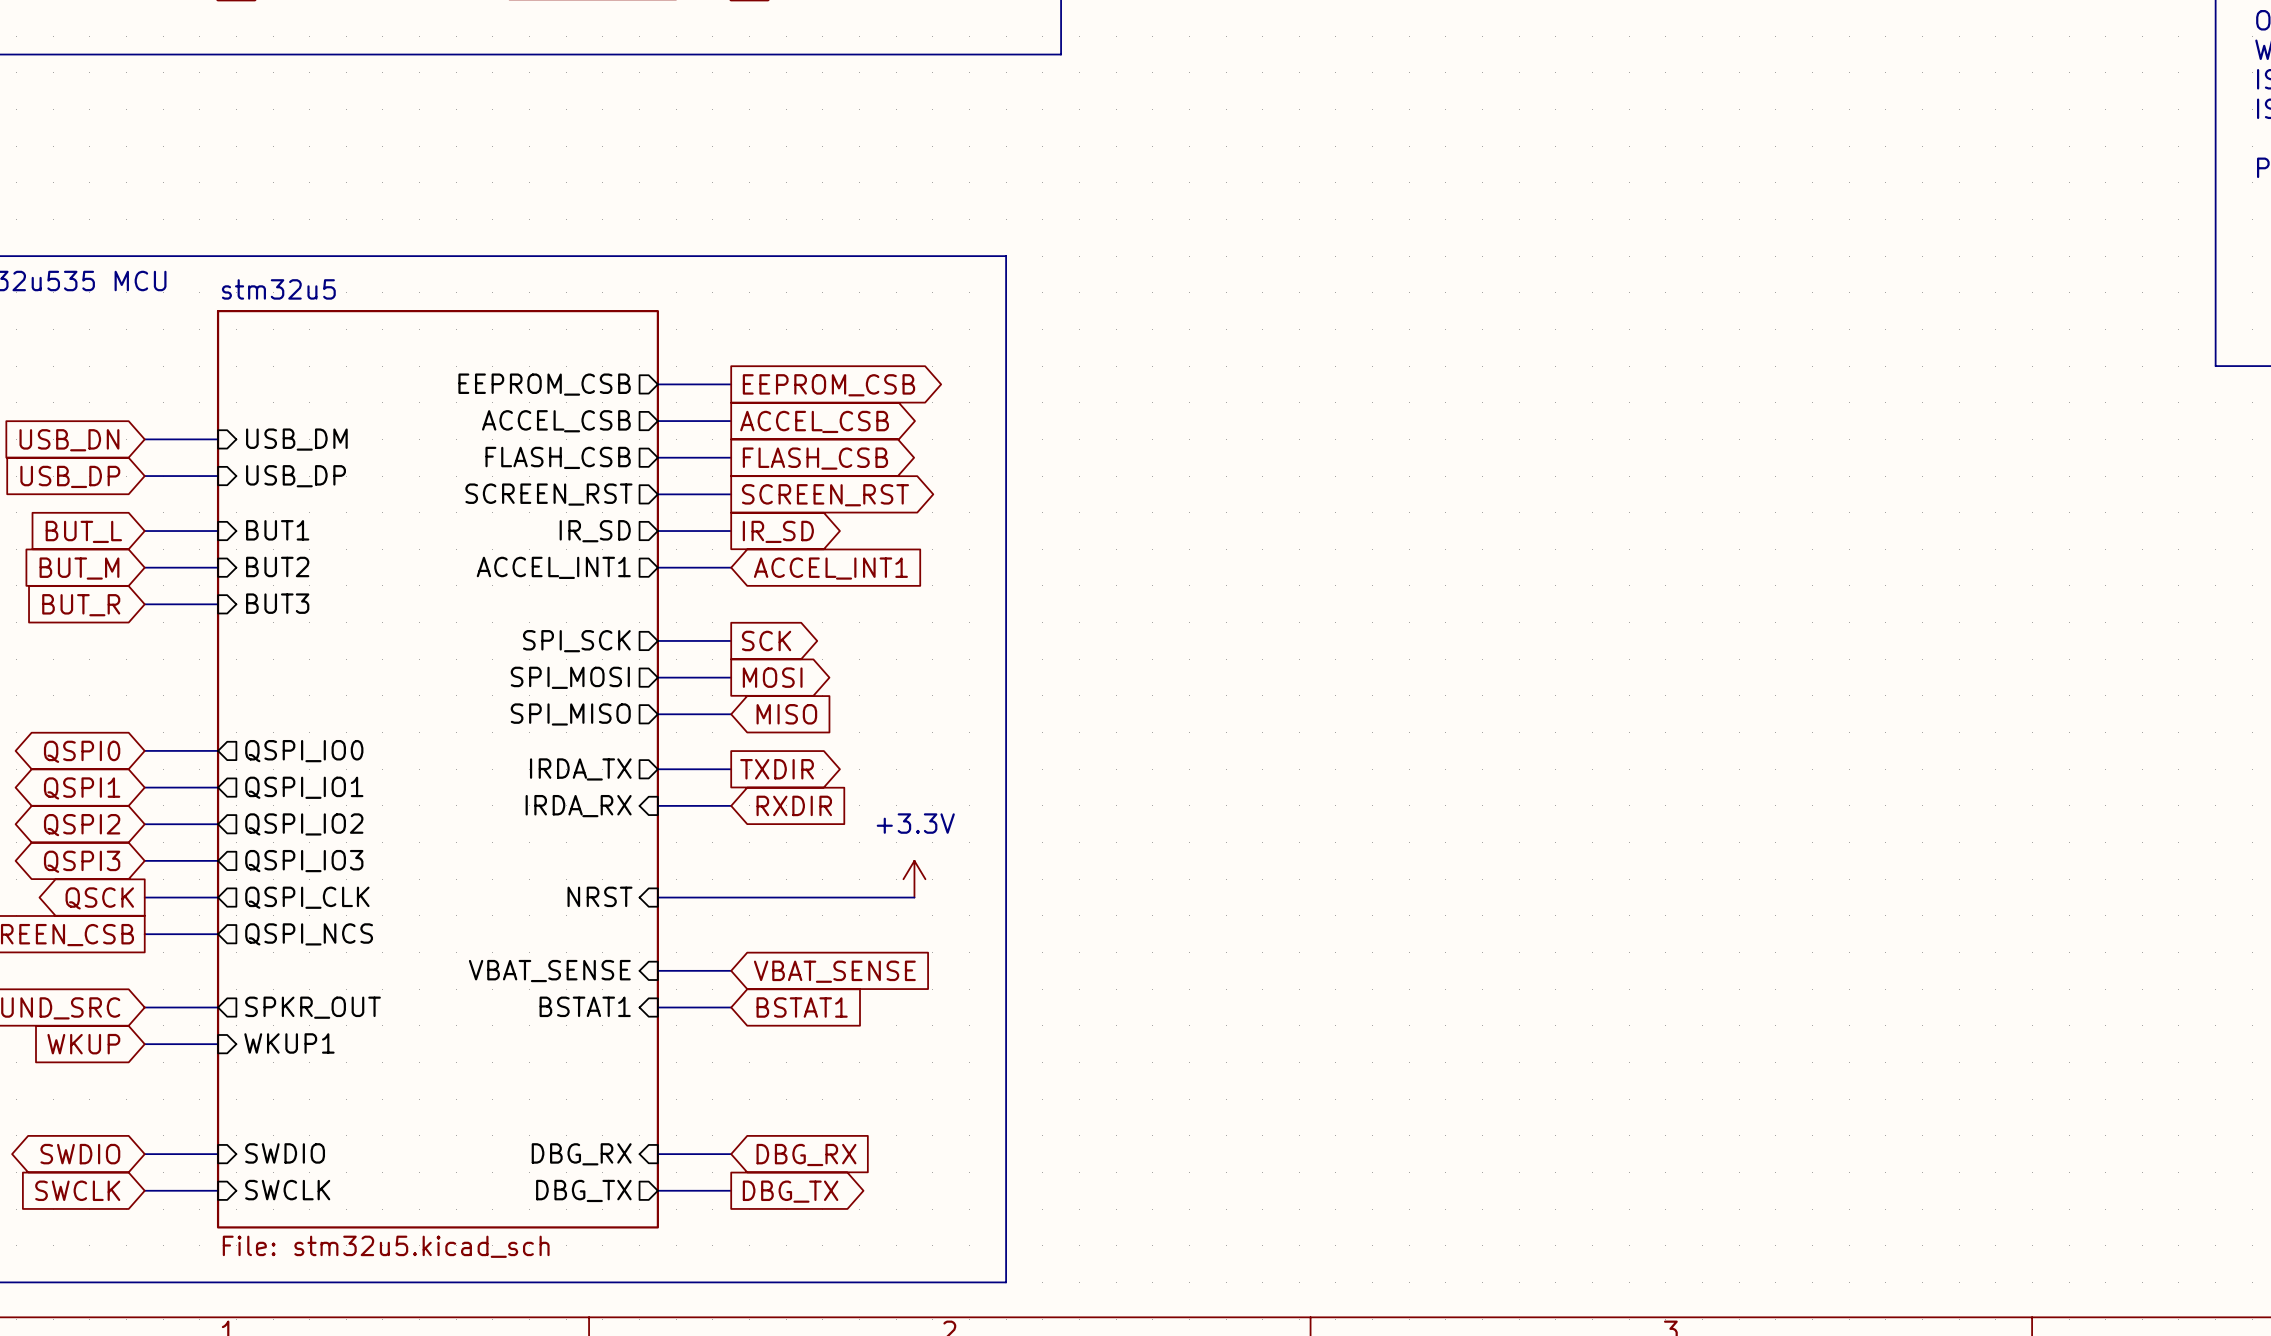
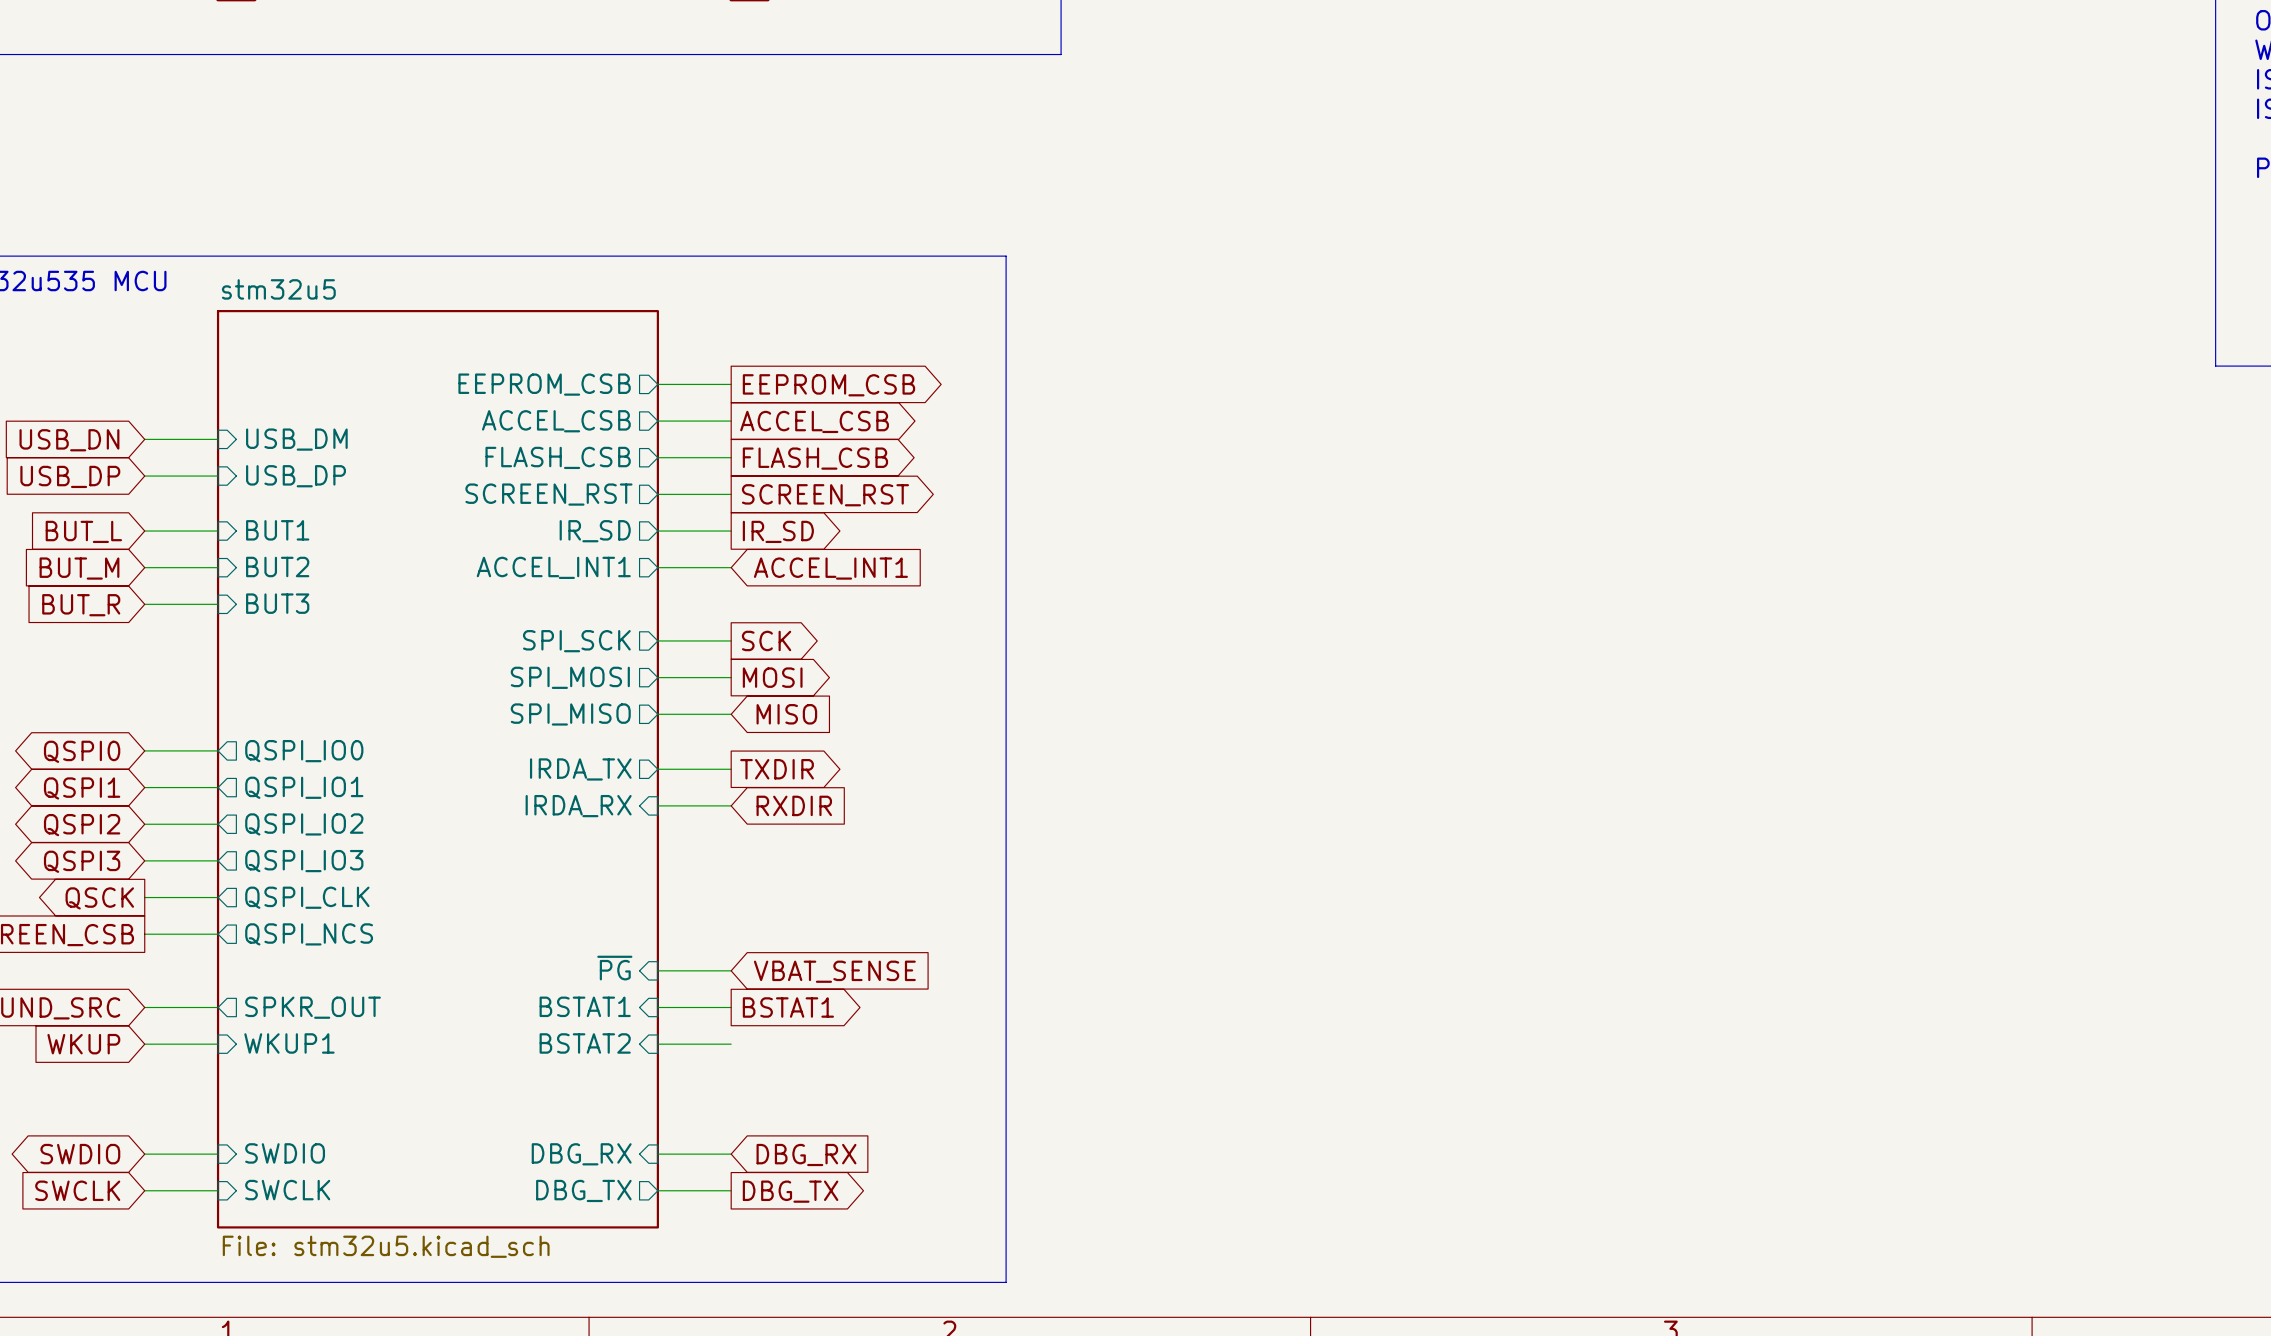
power symbol: +3.3V (914, 879) -> none
sheet pin: NRST (600, 896) -> none
wire: (657, 897) (914, 897) -> none
sheet pin: VBAT_SENSE (549, 971) -> ~{PG} (614, 968)
global label shape: input (802, 1007) -> output (788, 1007)
sheet pin: none -> BSTAT2 (585, 1043)
wire: none -> (657, 1044) (731, 1044)

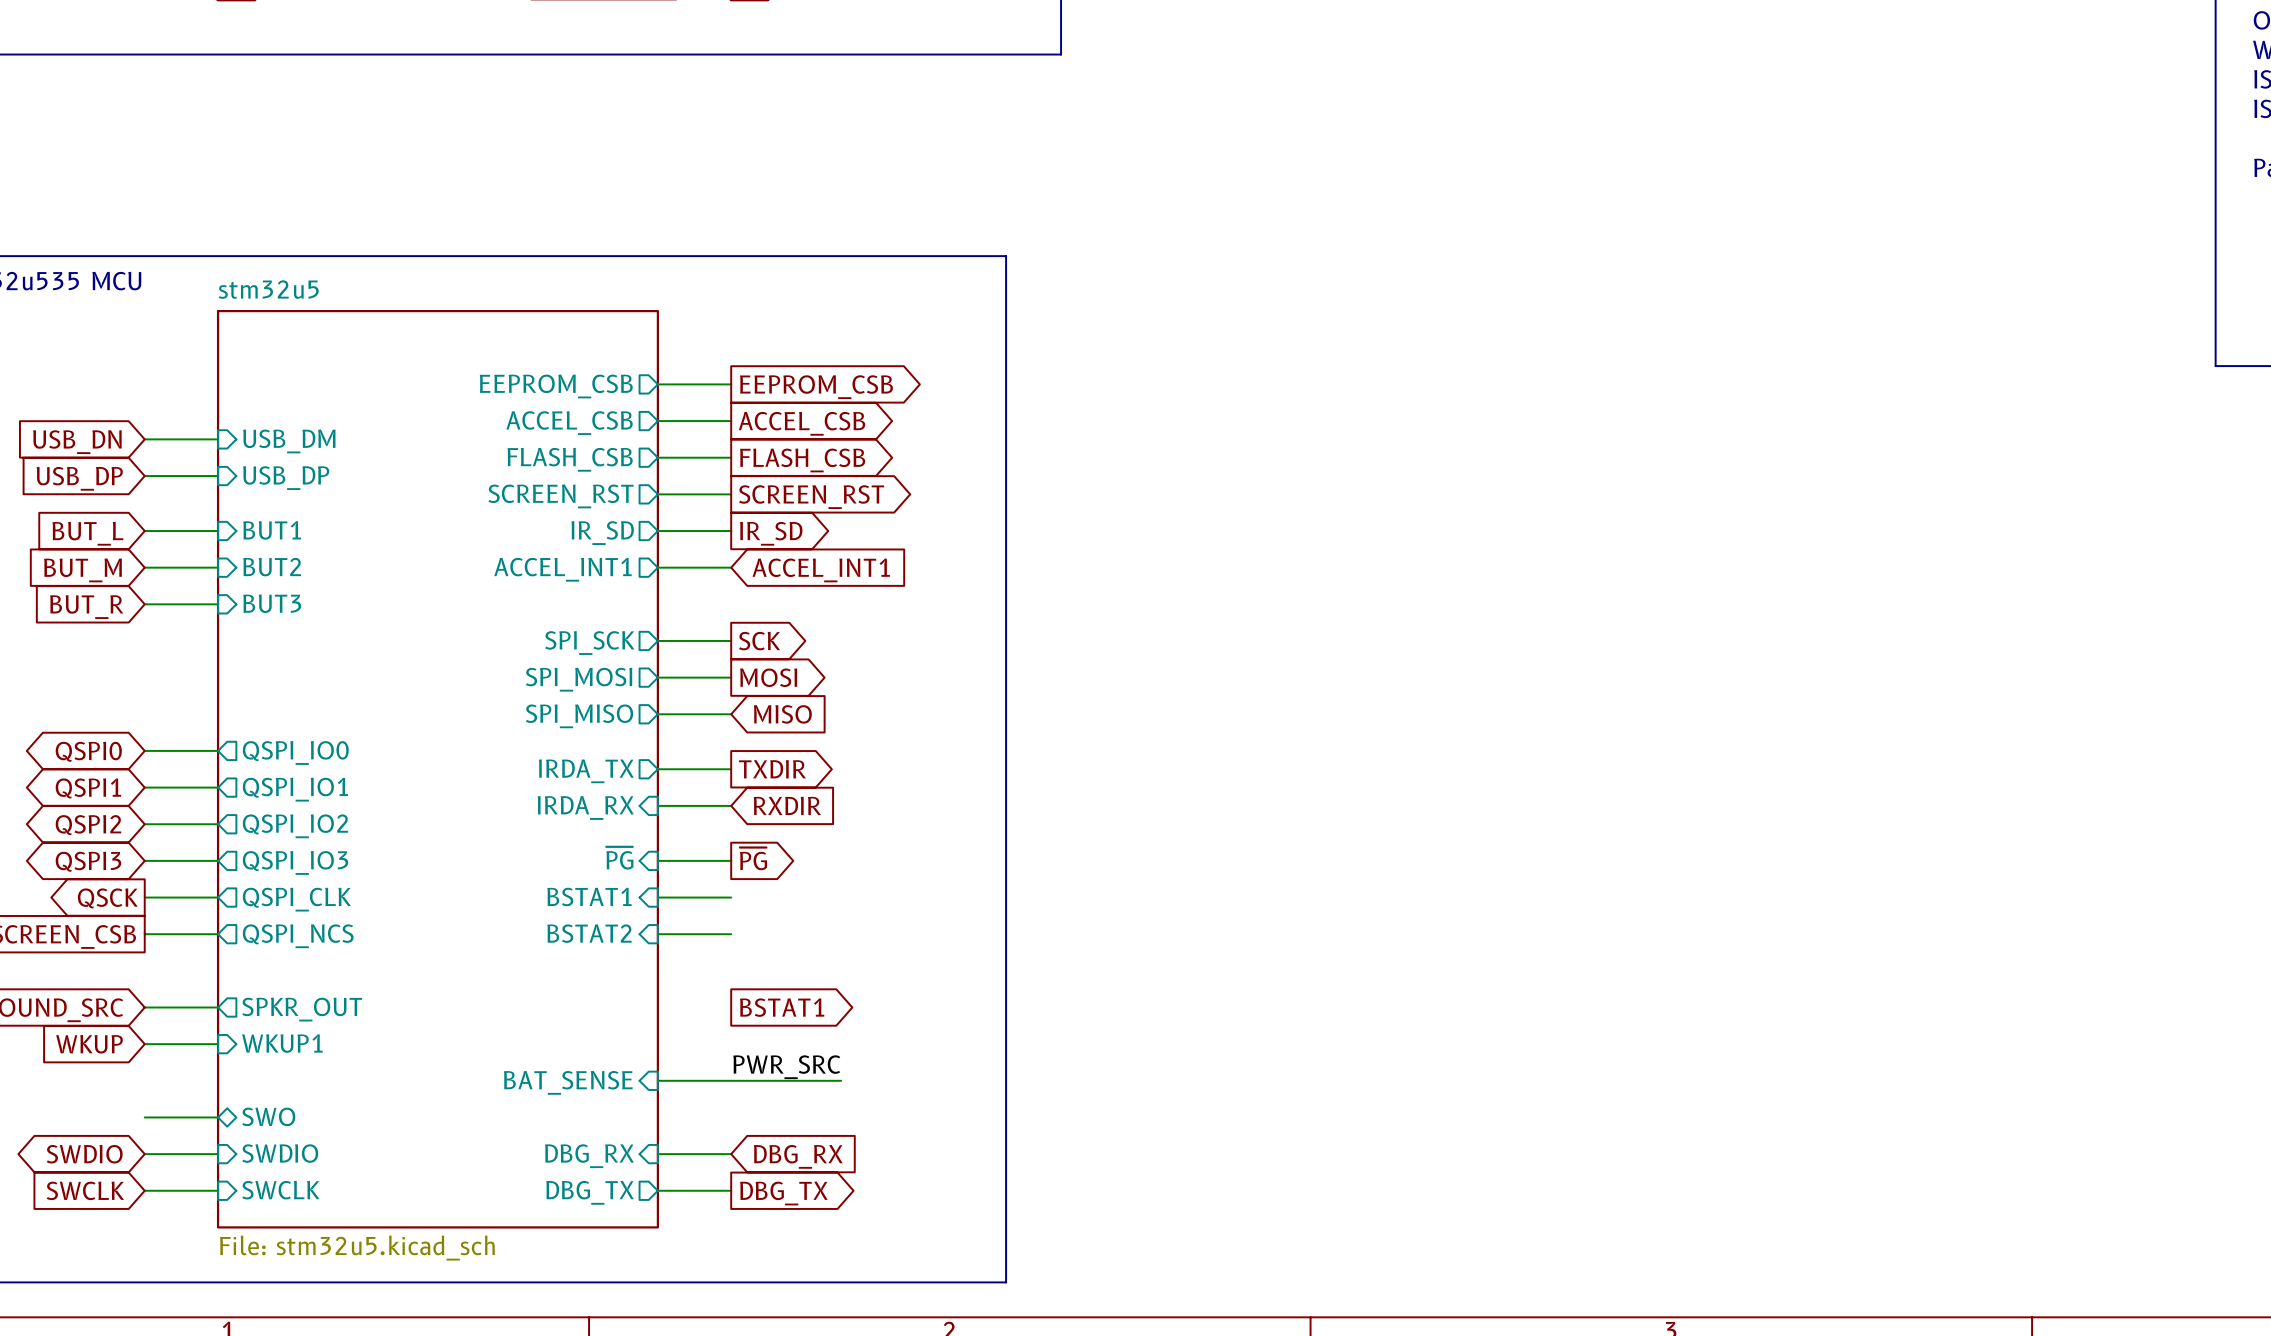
global label: none -> ~{PG} (753, 858)
sheet pin position: ~{PG} (614, 968) -> ~{PG} (619, 858)
wire: (657, 970) (731, 970) -> (657, 860) (731, 860)
global label: VBAT_SENSE (834, 971) -> none
sheet pin position: BSTAT1 (585, 1006) -> BSTAT1 (589, 896)
wire: (657, 1007) (731, 1007) -> (657, 897) (731, 897)
sheet pin position: BSTAT2 (585, 1043) -> BSTAT2 (589, 933)
wire: (657, 1044) (731, 1044) -> (657, 934) (731, 934)
label: none -> PWR_SRC (786, 1067)
sheet pin: none -> BAT_SENSE (568, 1082)
wire: none -> (657, 1080) (841, 1080)
sheet pin: none -> SWO (268, 1116)
wire: none -> (144, 1117) (218, 1117)

